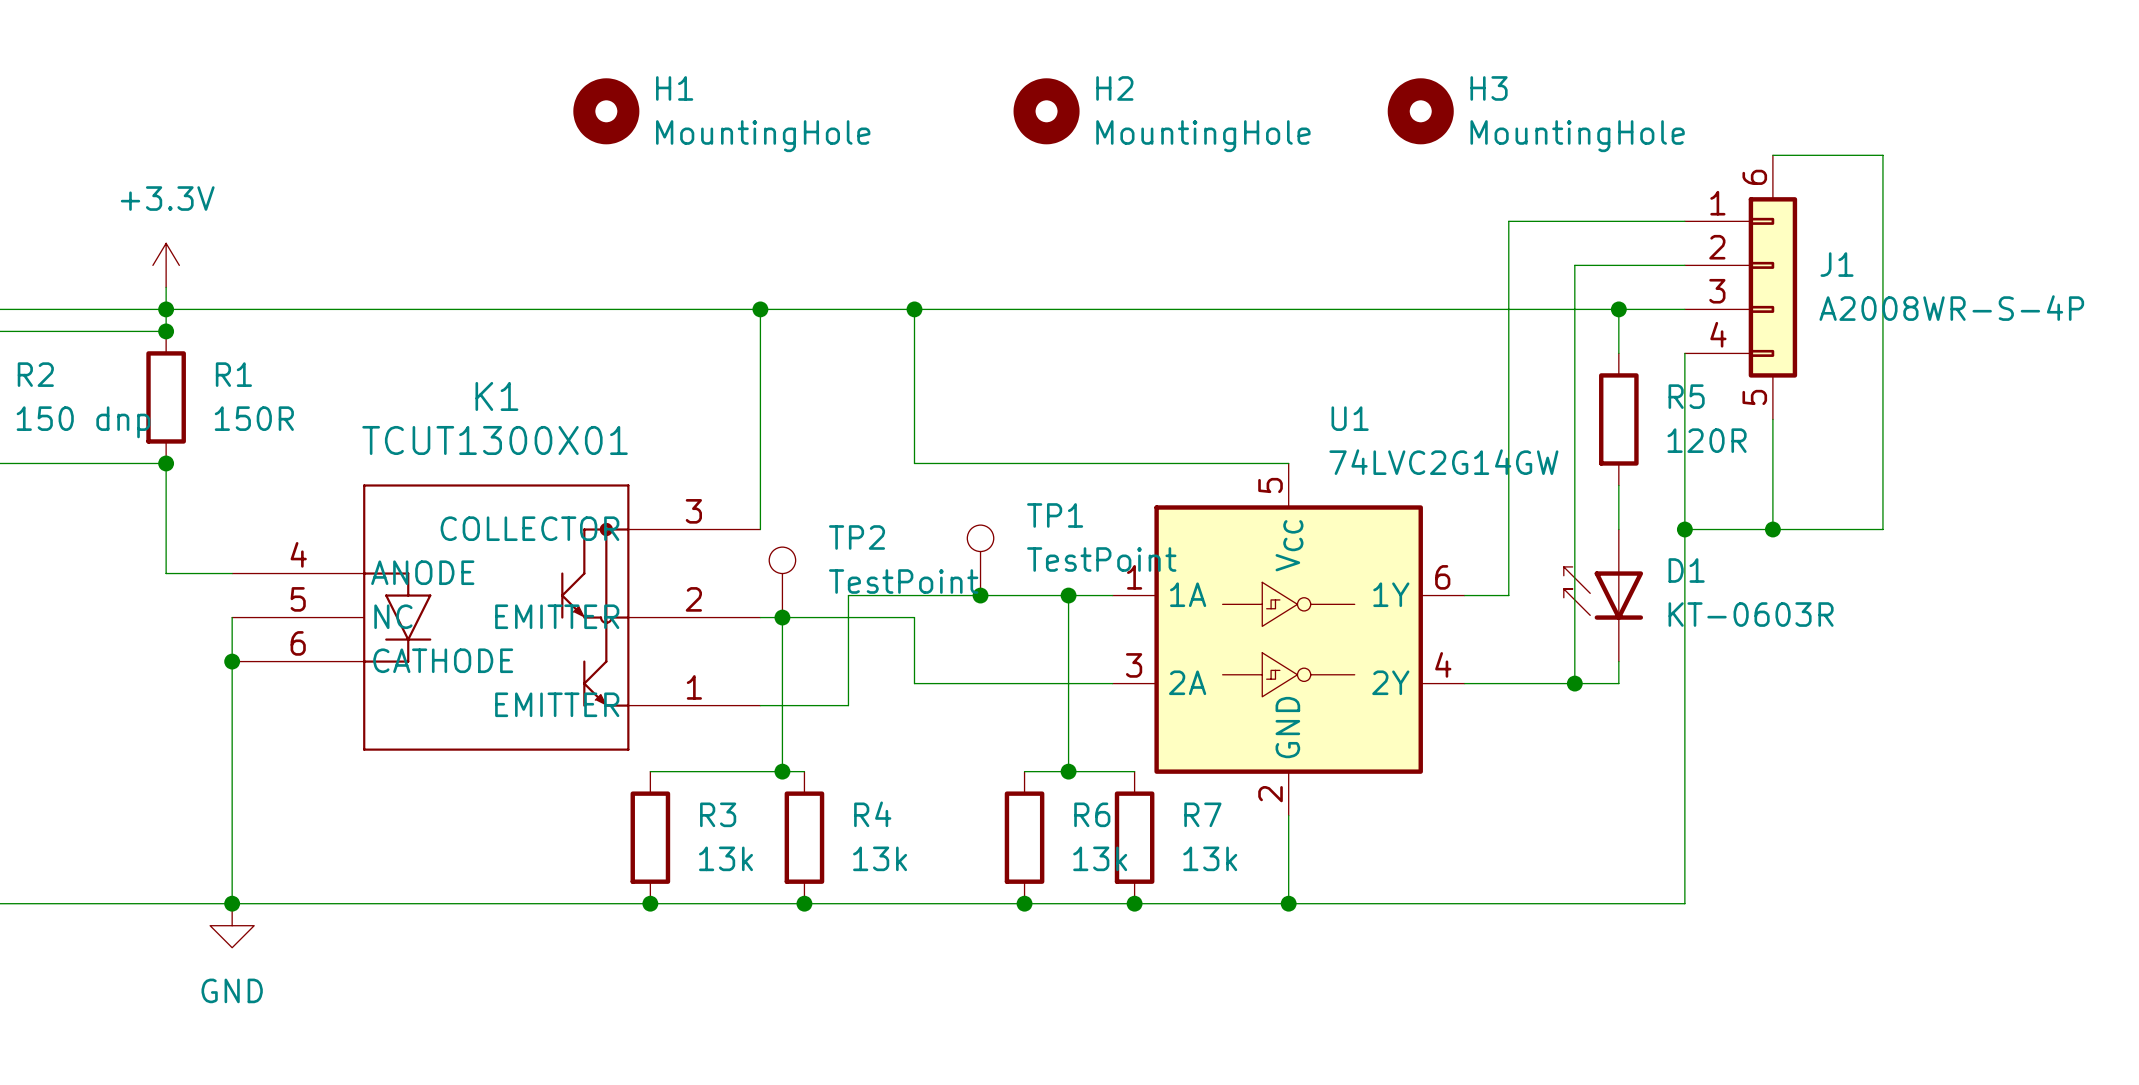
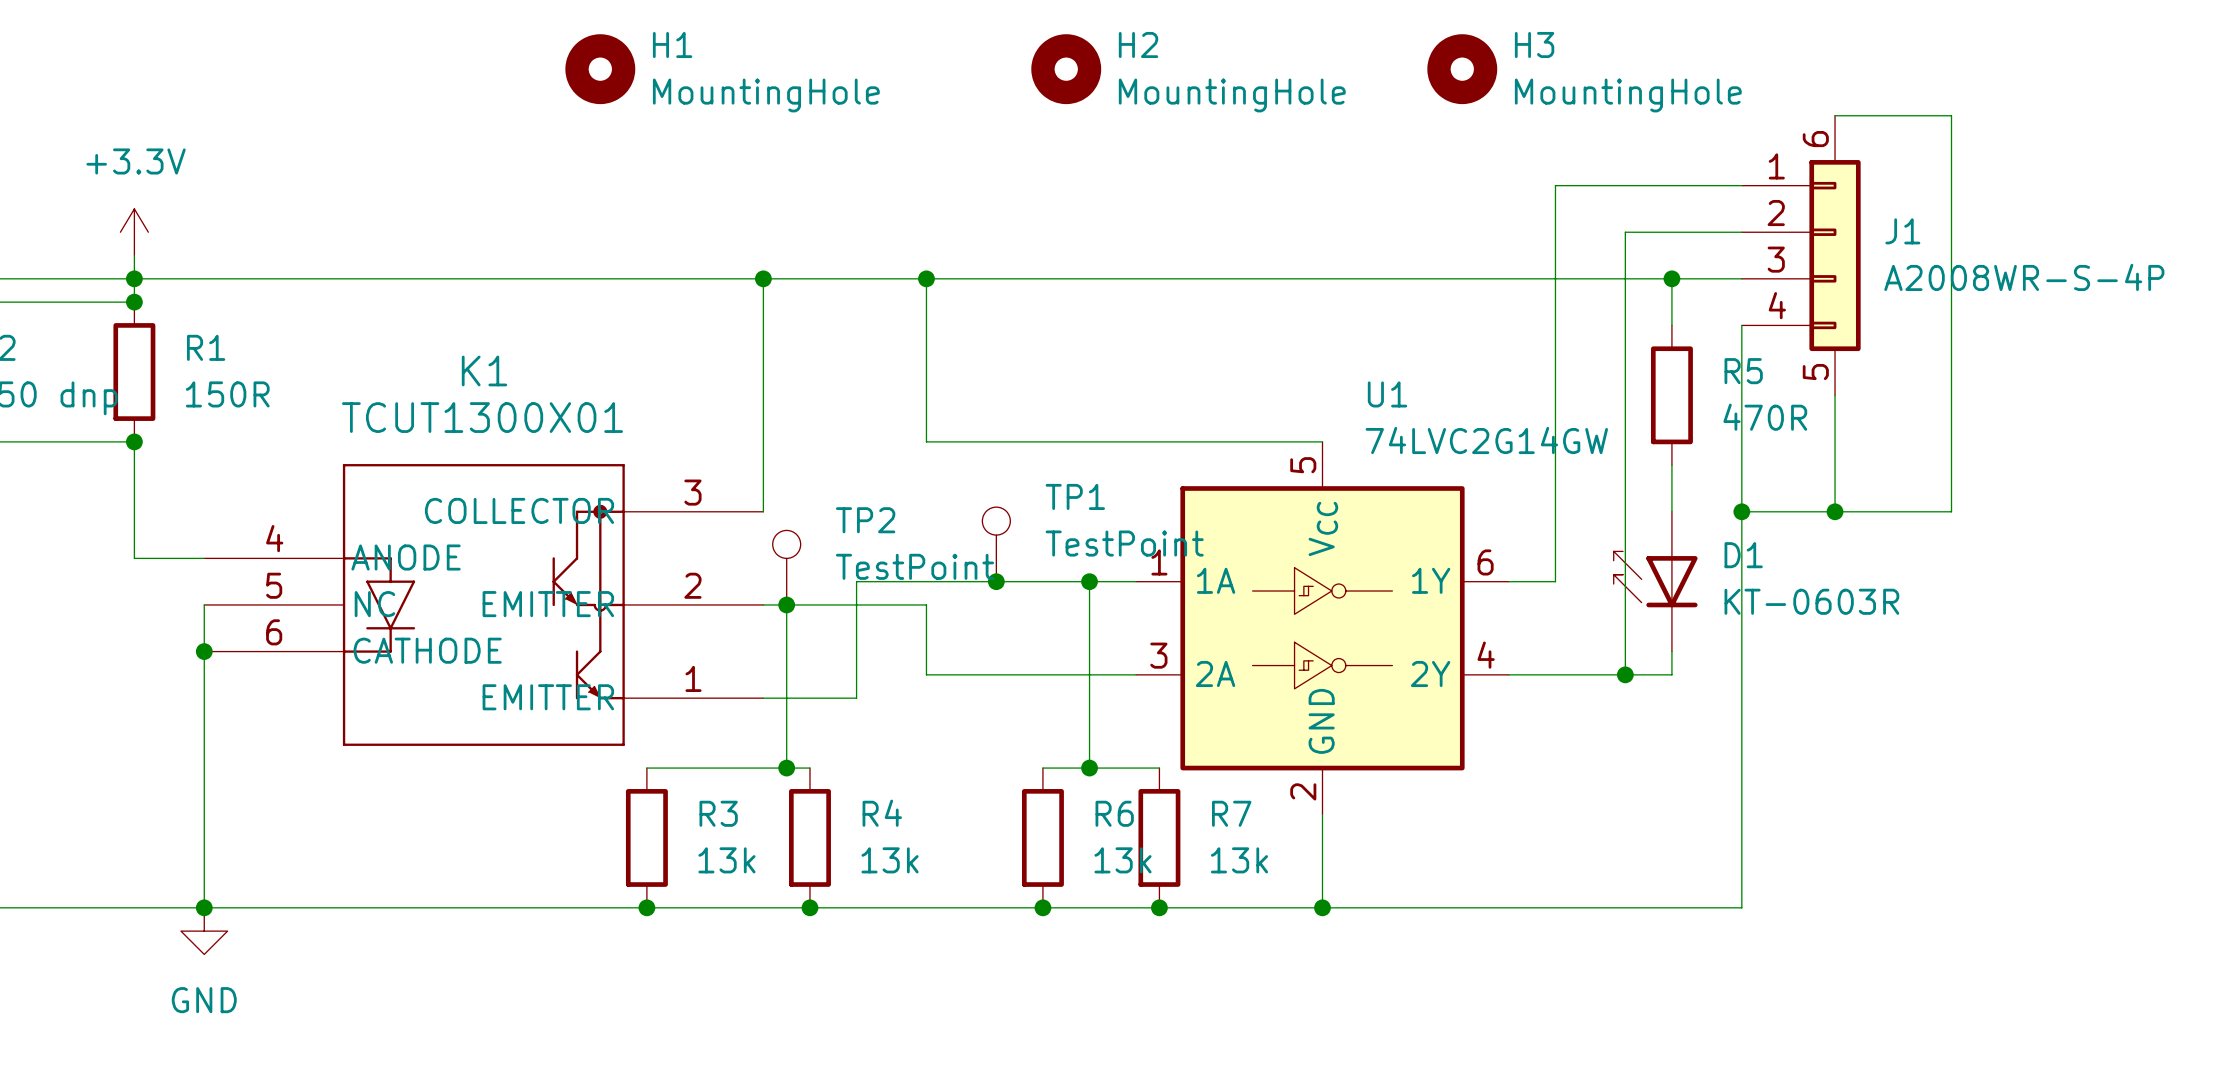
R5 value: 120R (1707, 440) -> 470R (1765, 417)

